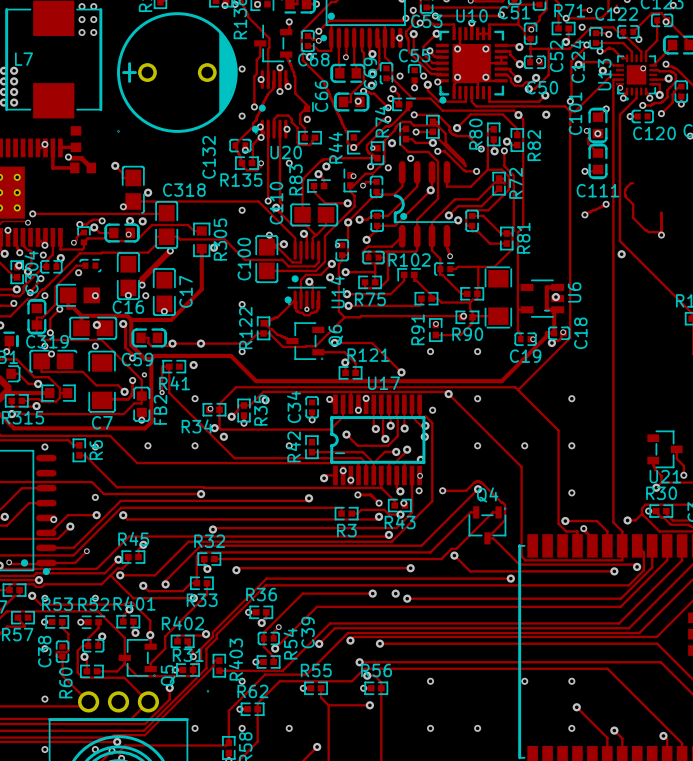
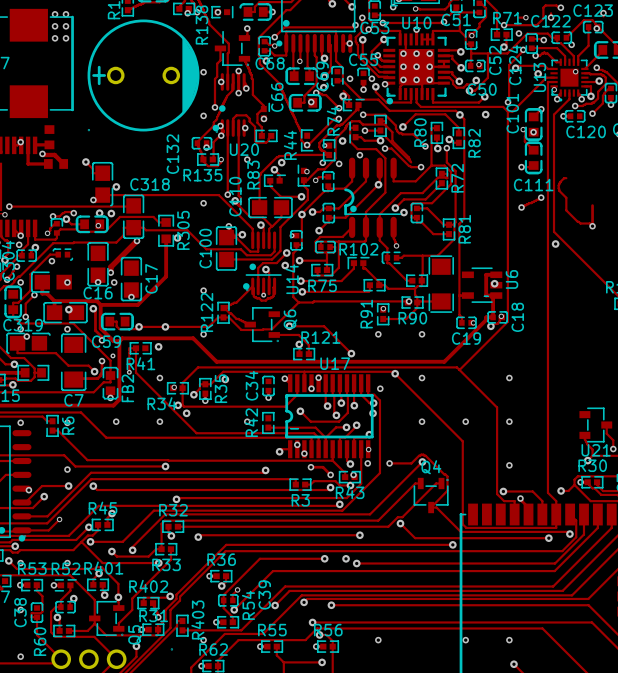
via: none -> (416, 53)
via: none -> (403, 66)
via: none -> (416, 66)
via: none -> (429, 66)
via: none -> (416, 79)
via: (393, 89) -> none
via: none -> (343, 96)
via: (390, 98) -> none

